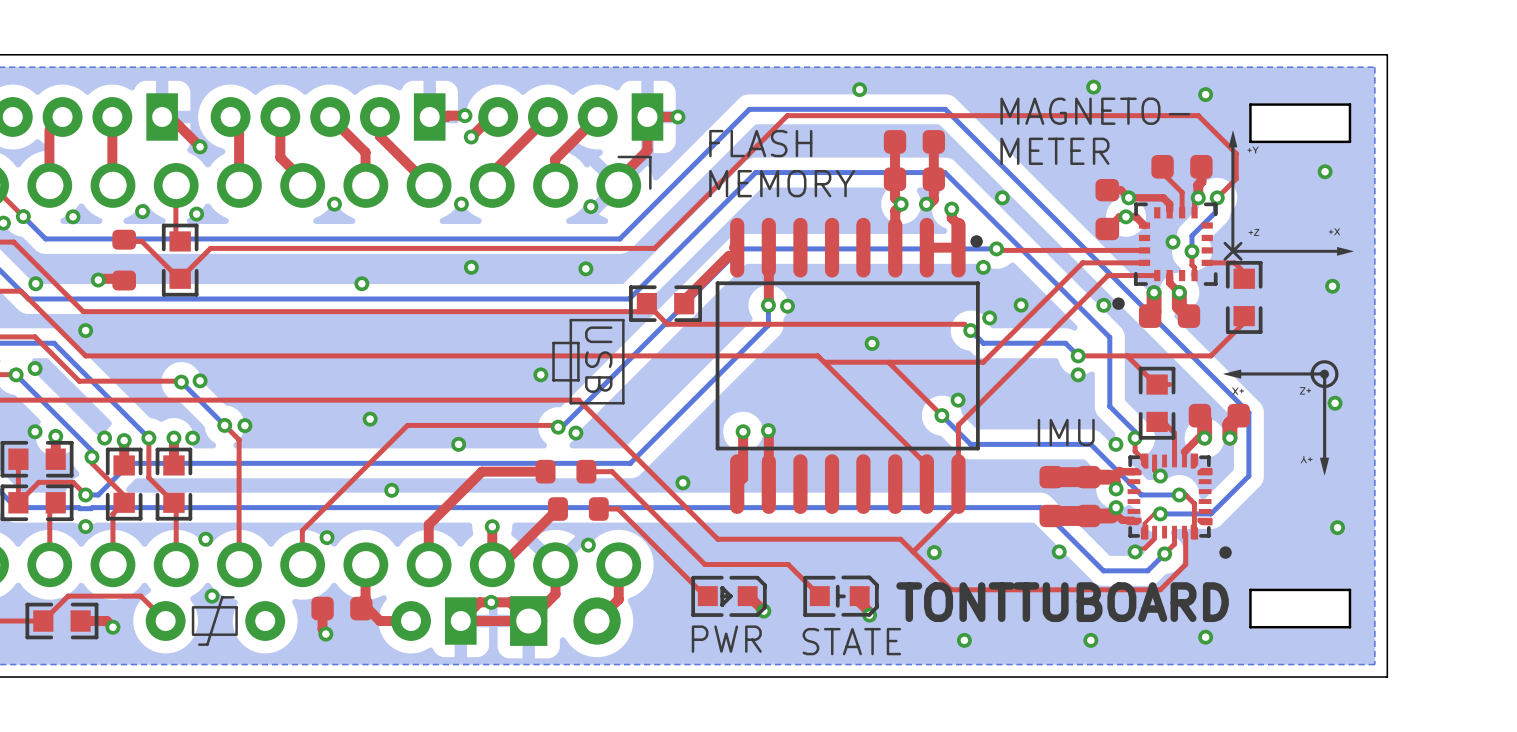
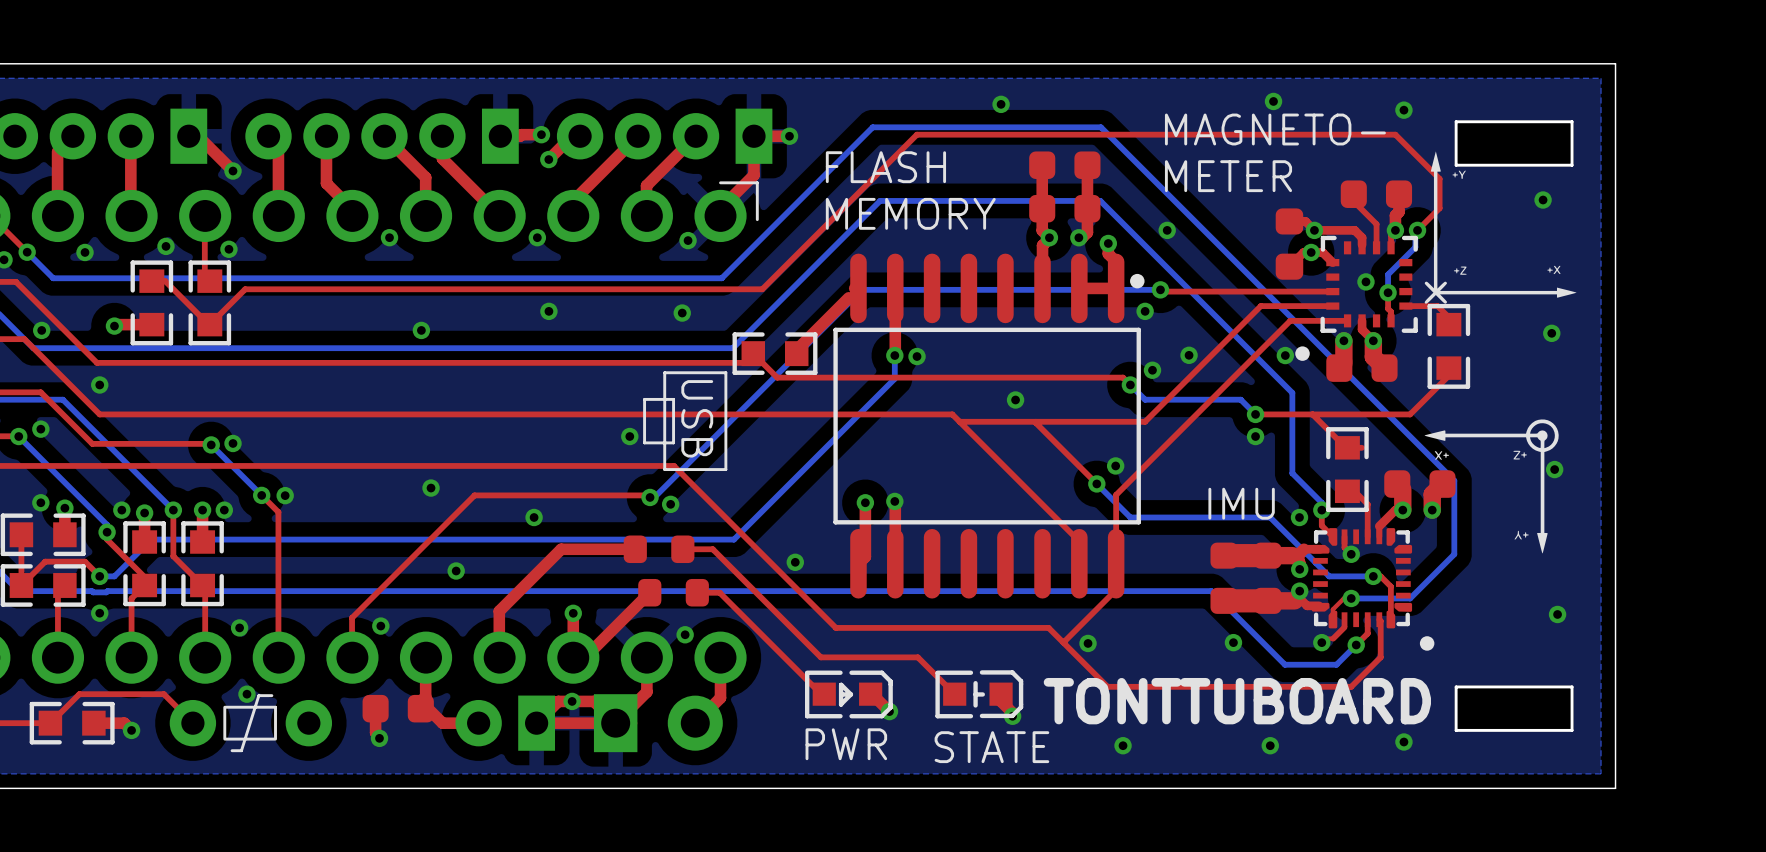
part footprint: [112, 229, 137, 291] -> [130, 260, 174, 346]

